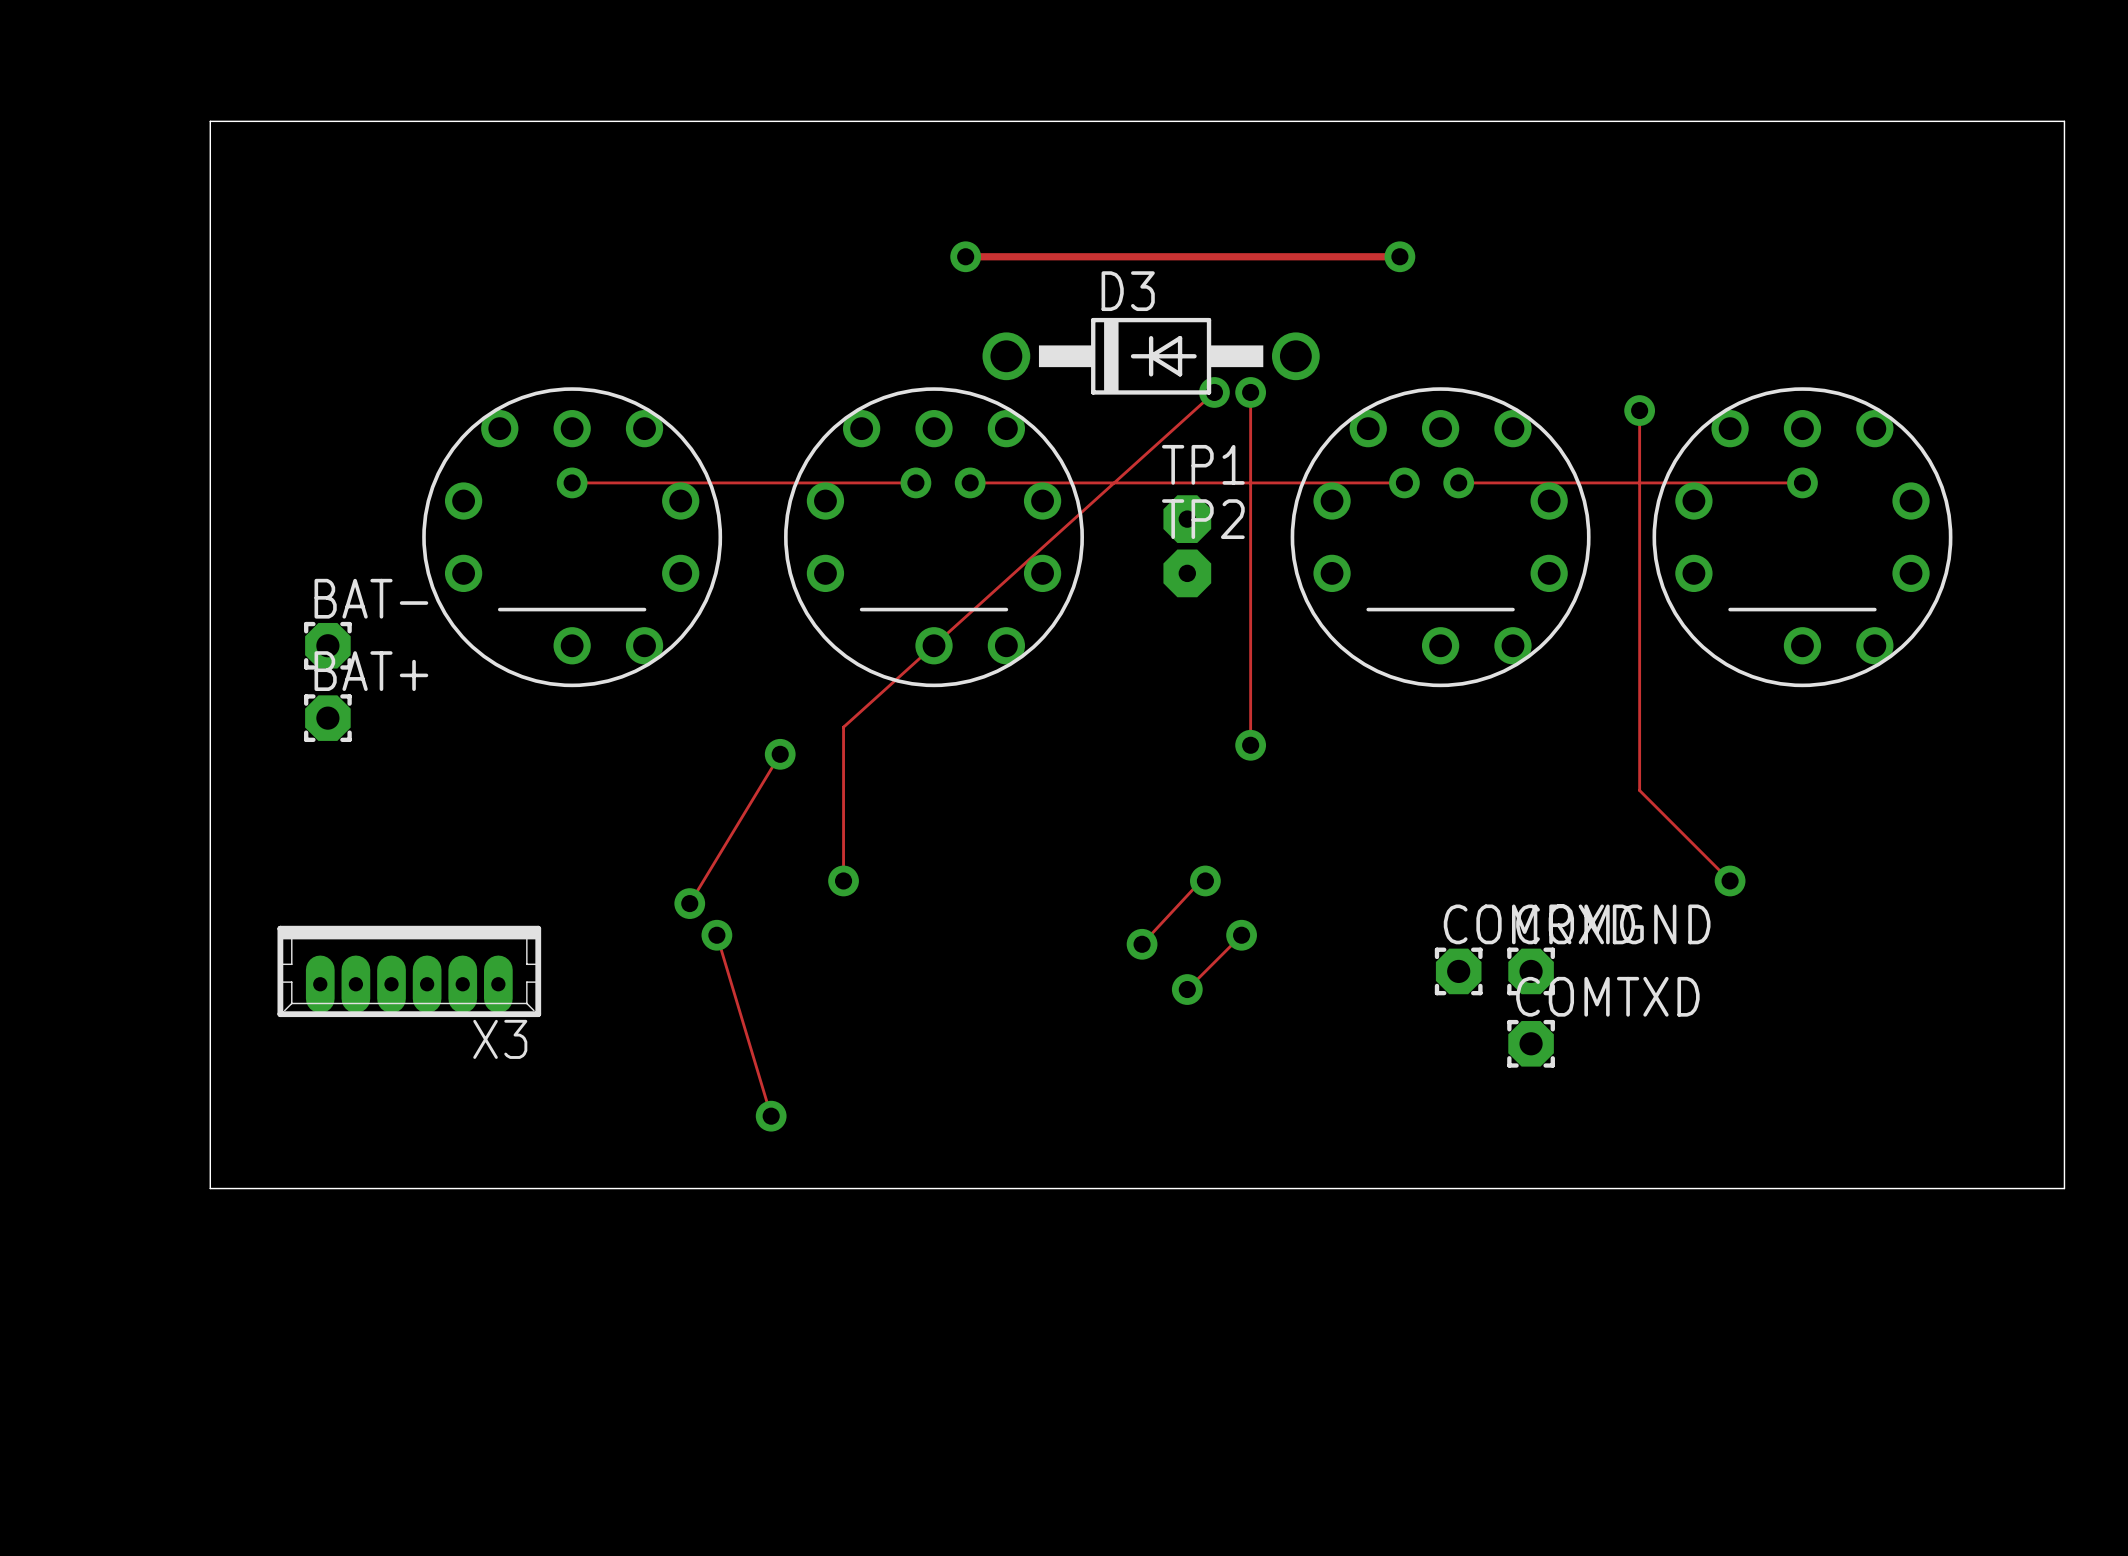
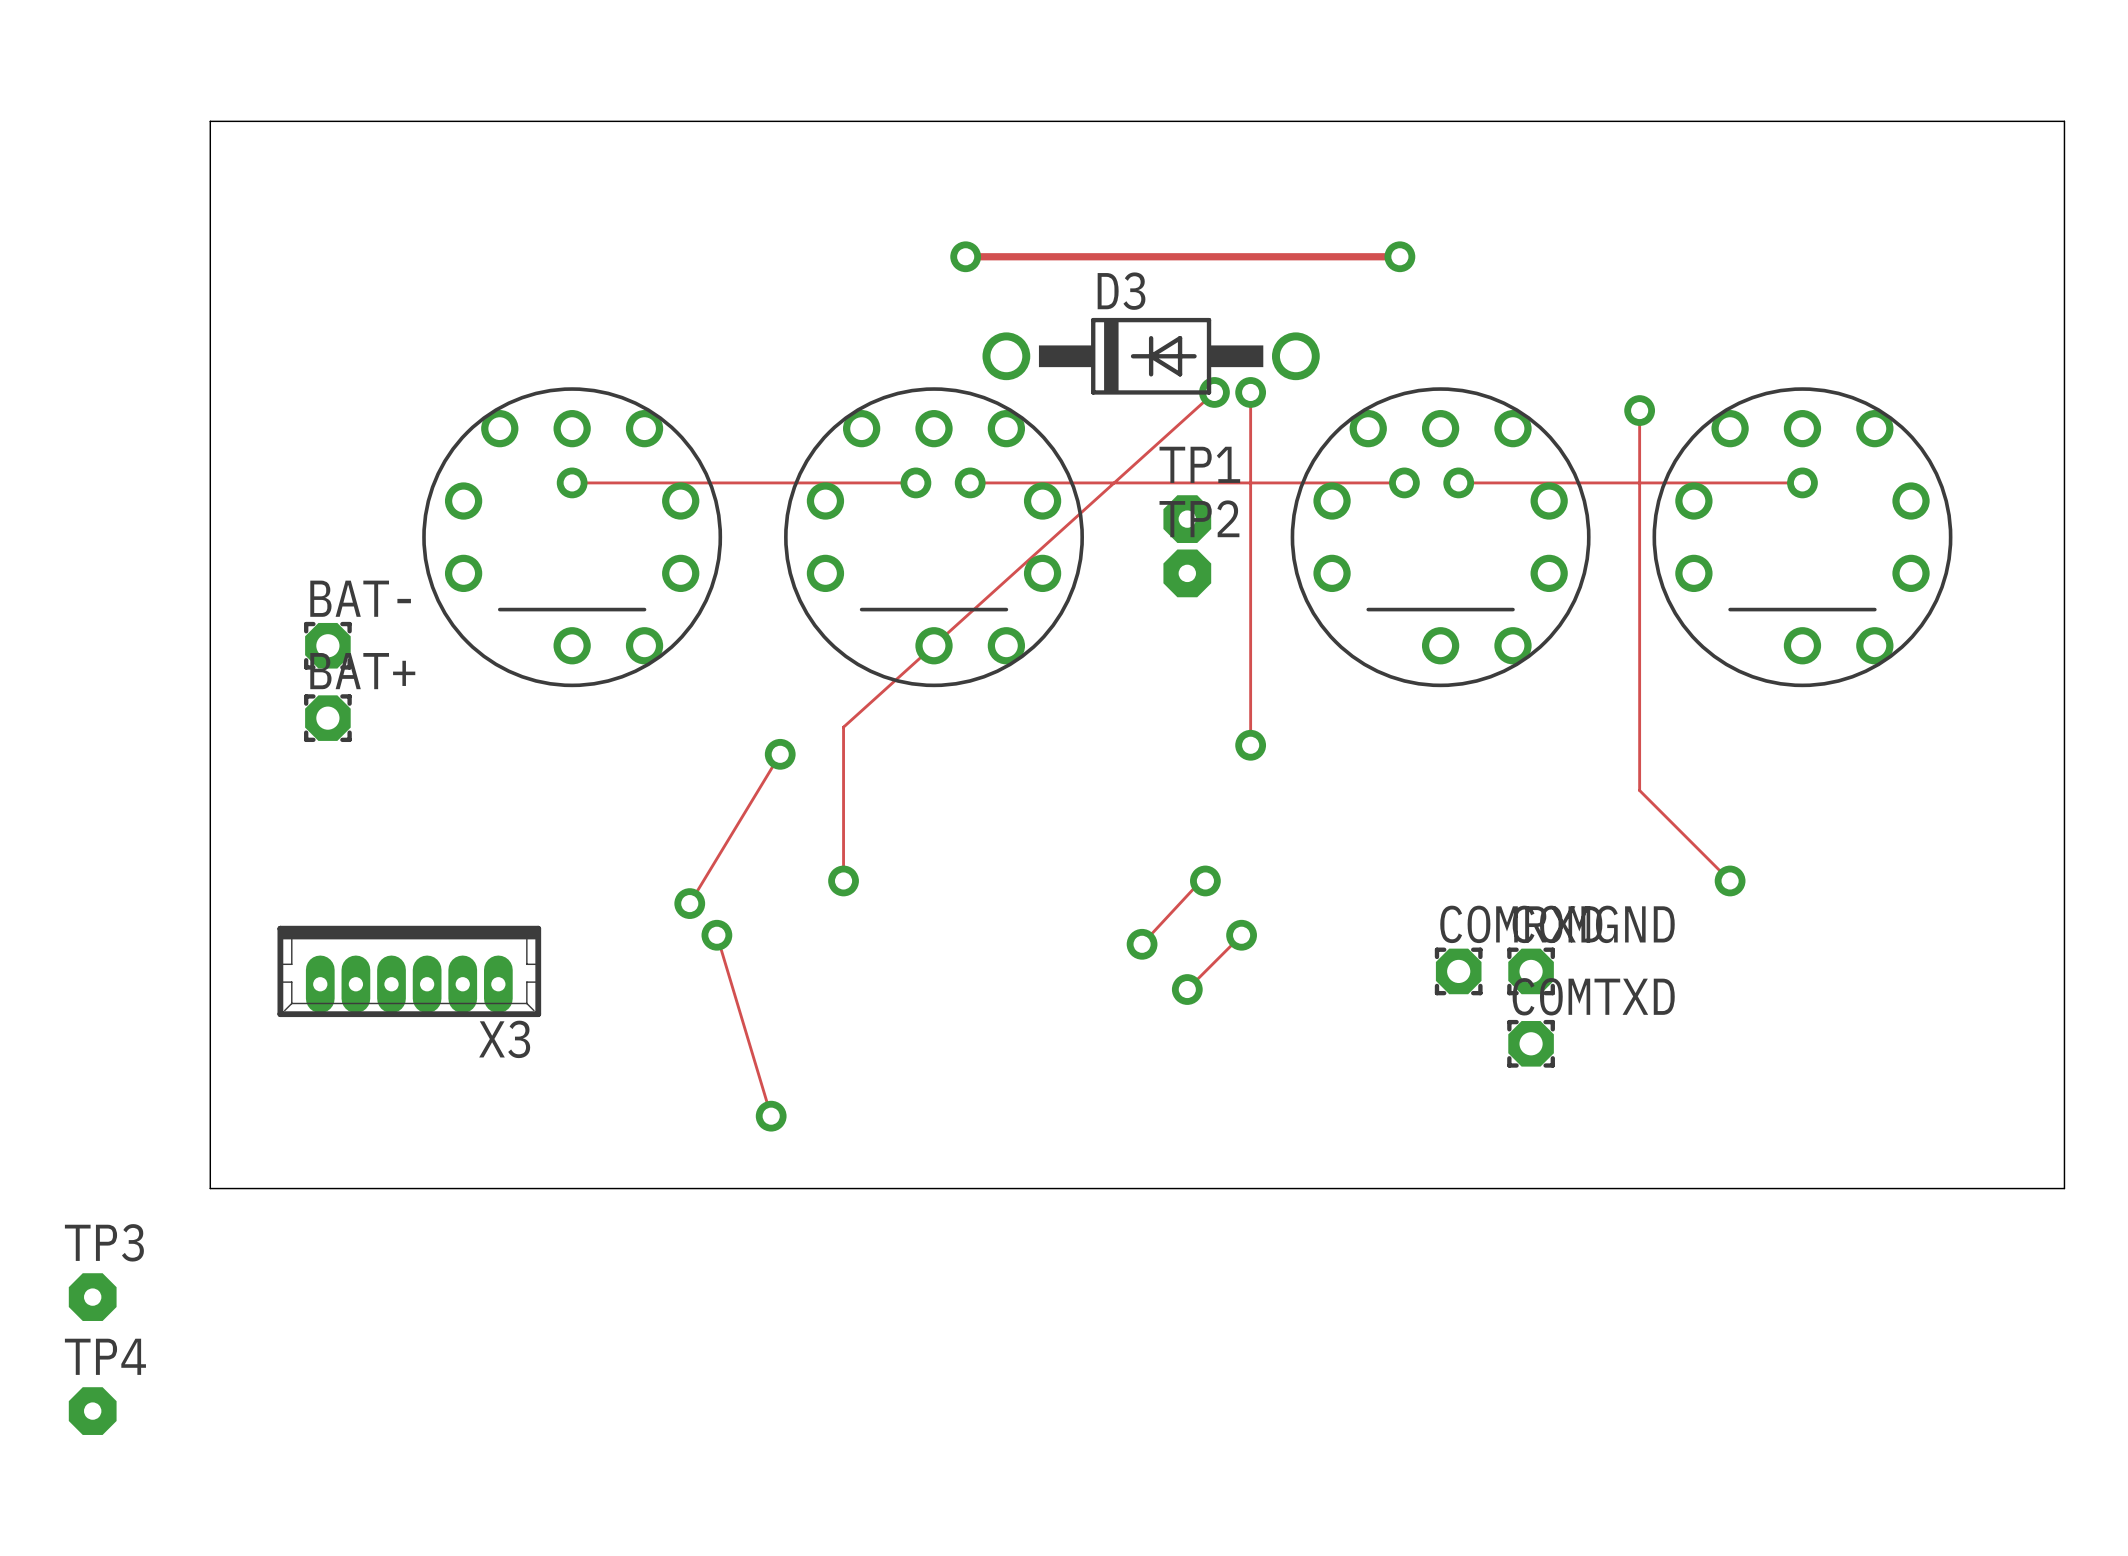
TP3: none -> (92, 1297)
TP4: none -> (92, 1411)

